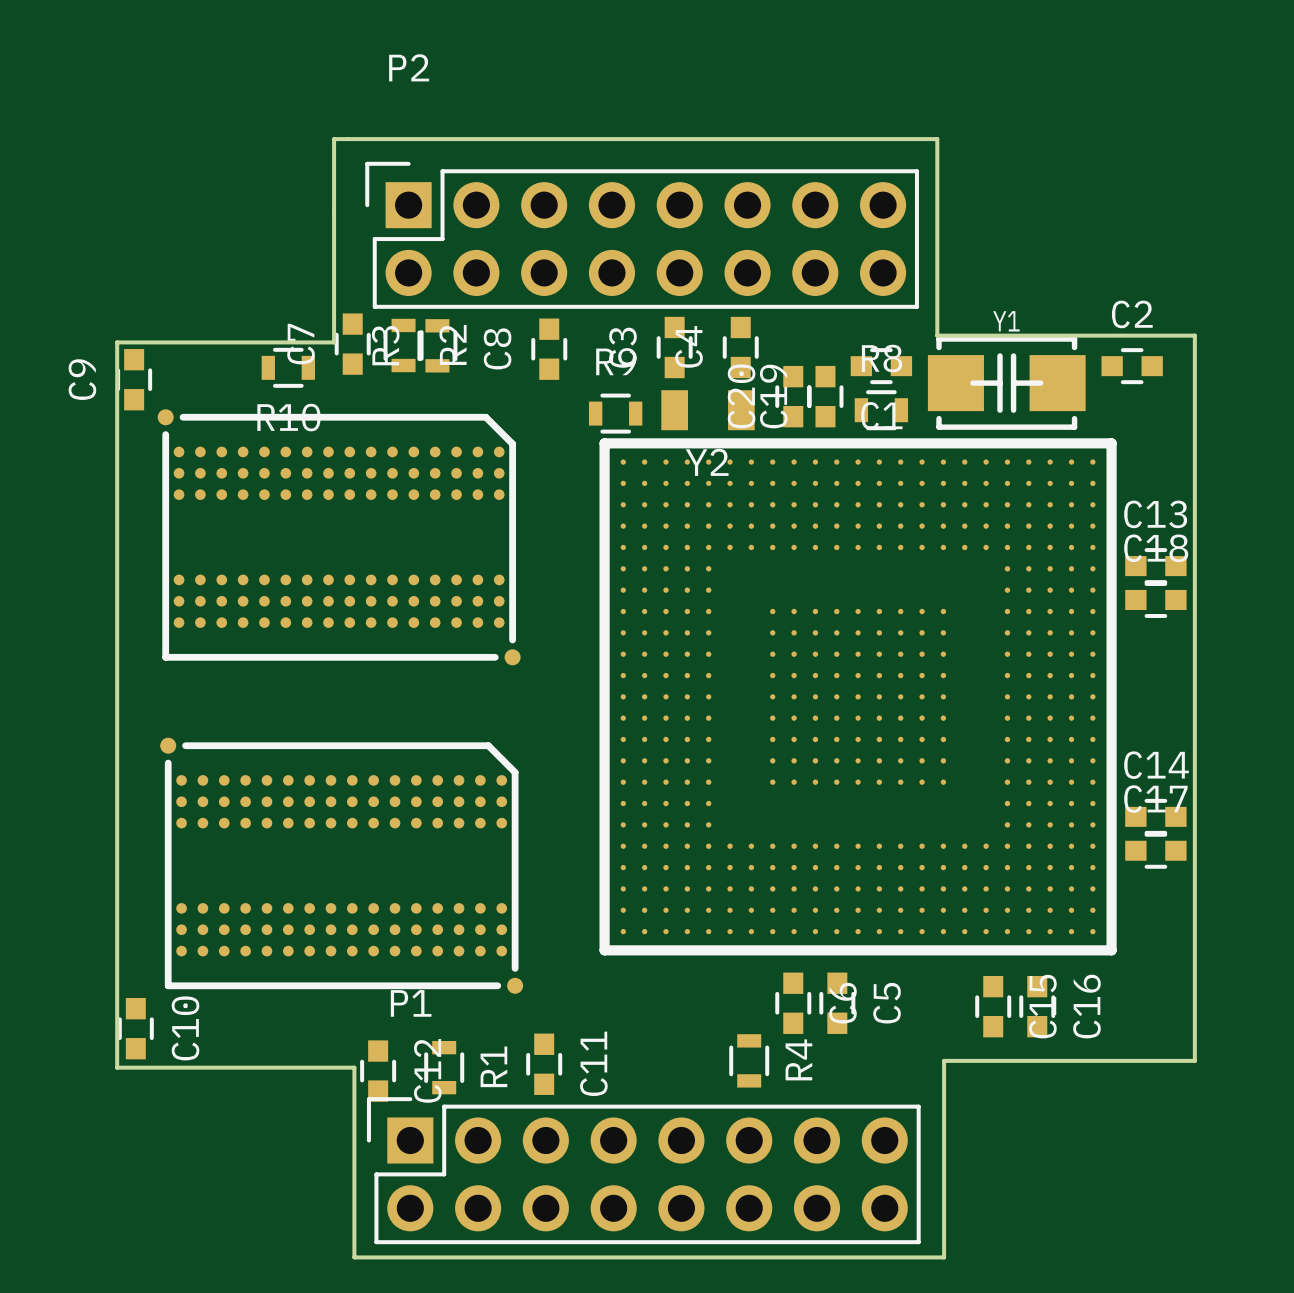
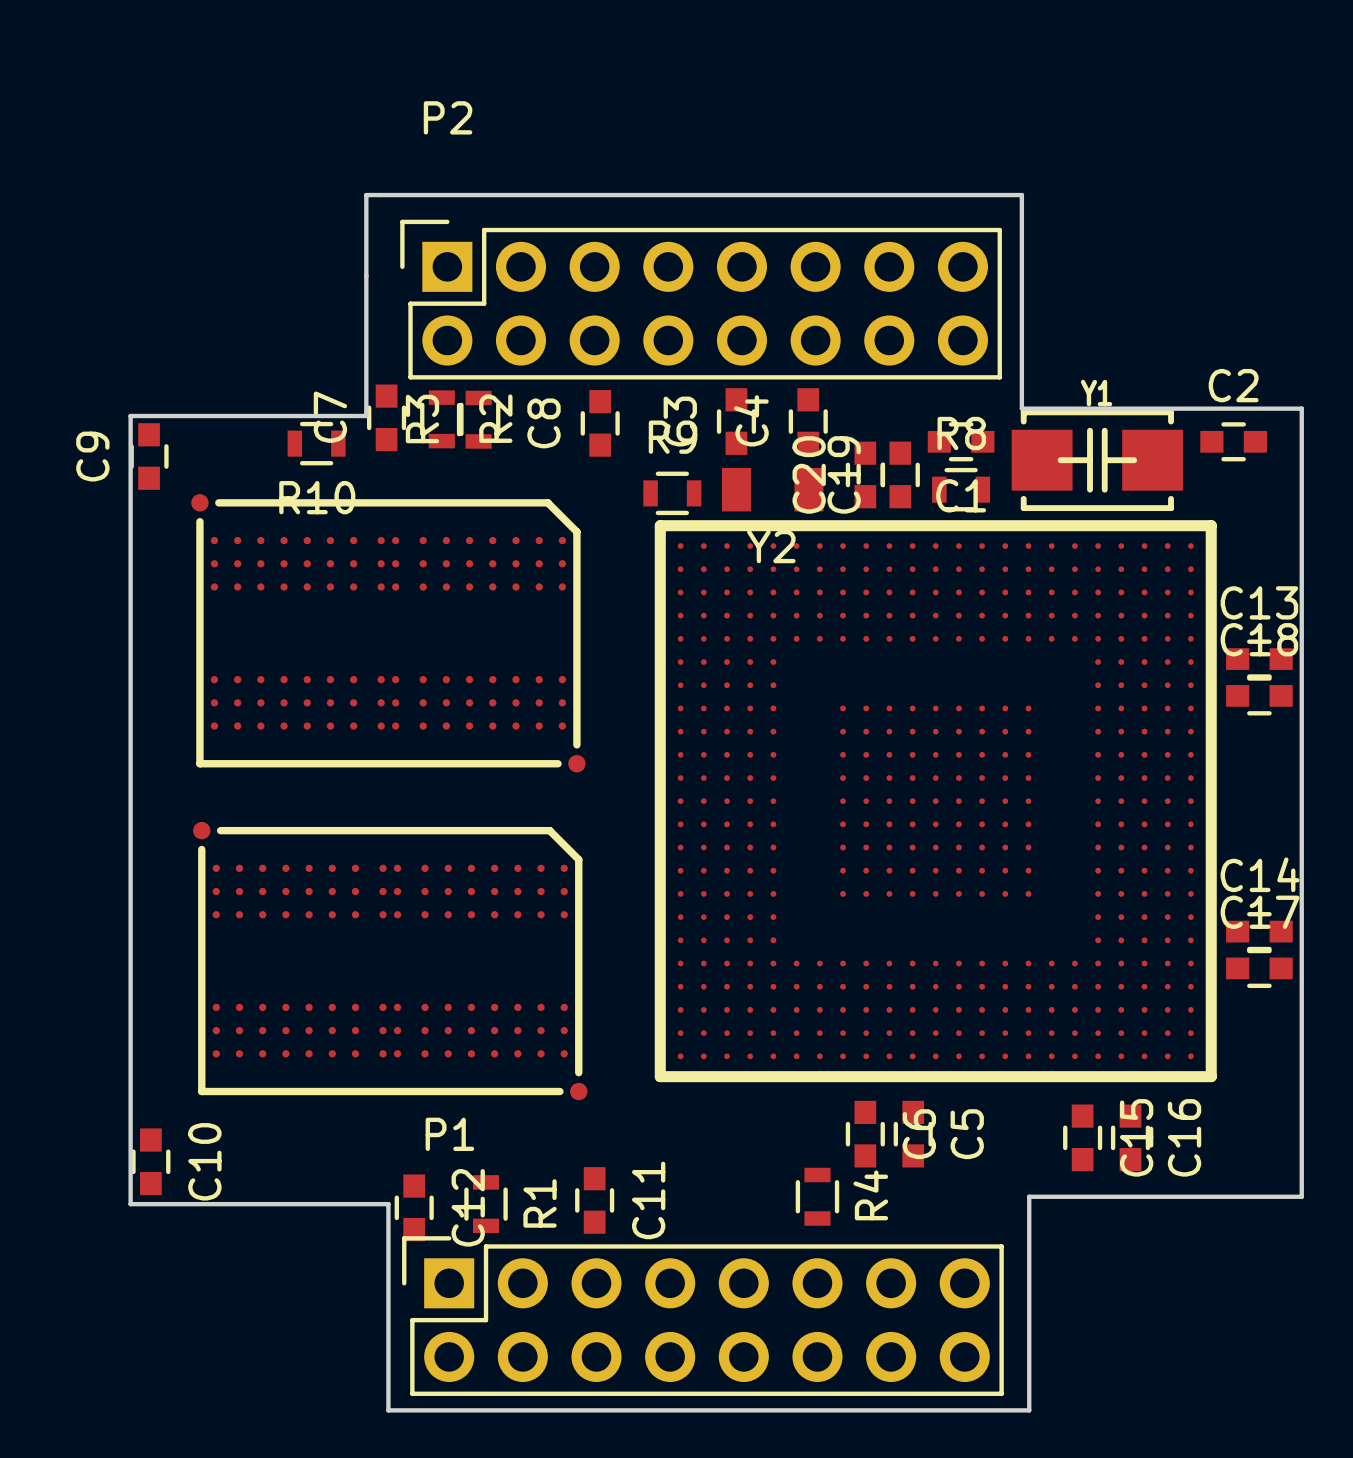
part footprint: [157, 409, 521, 666] -> [191, 494, 586, 773]
part footprint: [160, 737, 524, 994] -> [193, 821, 588, 1101]

